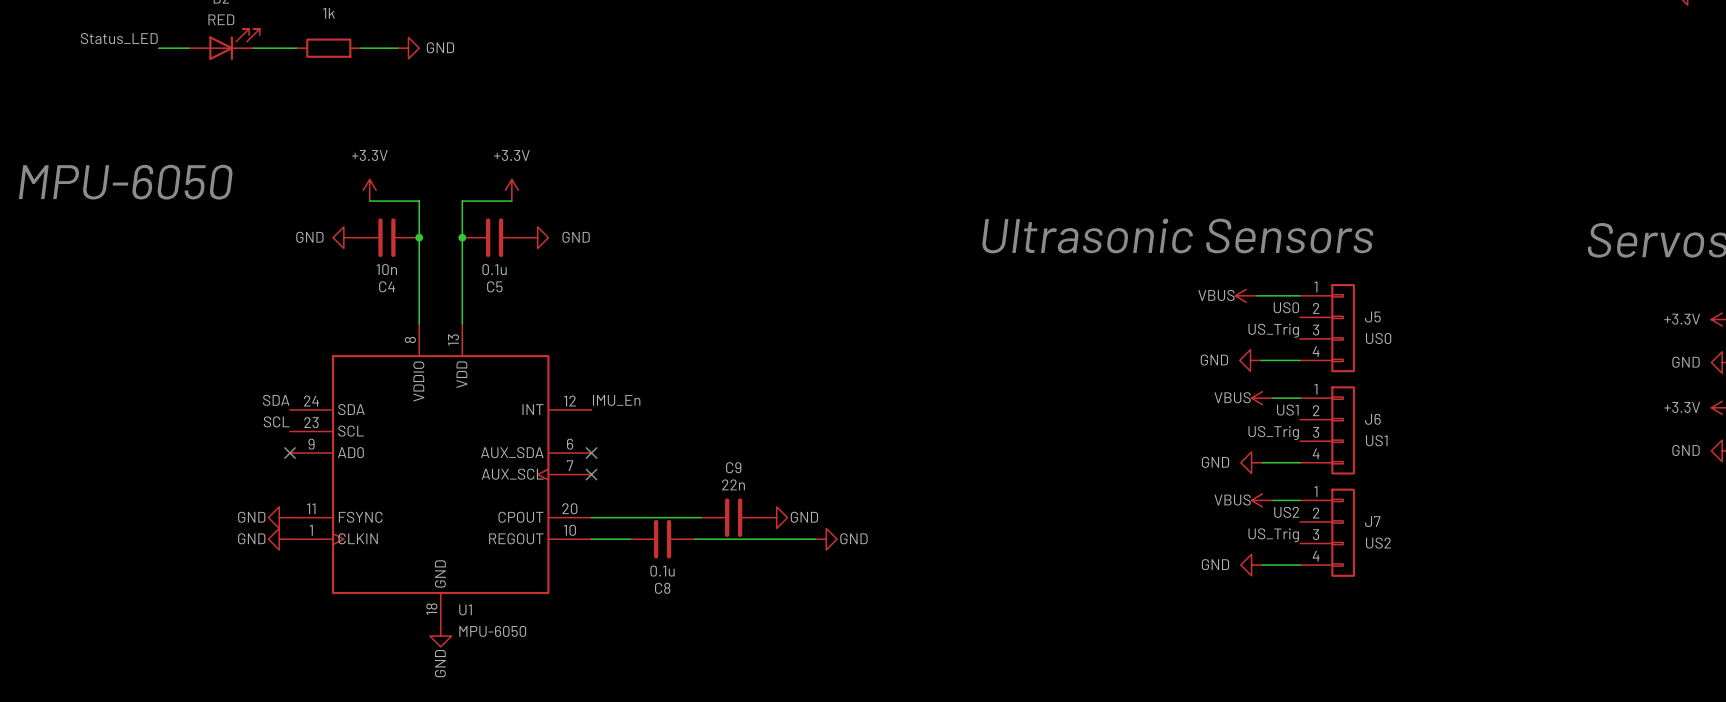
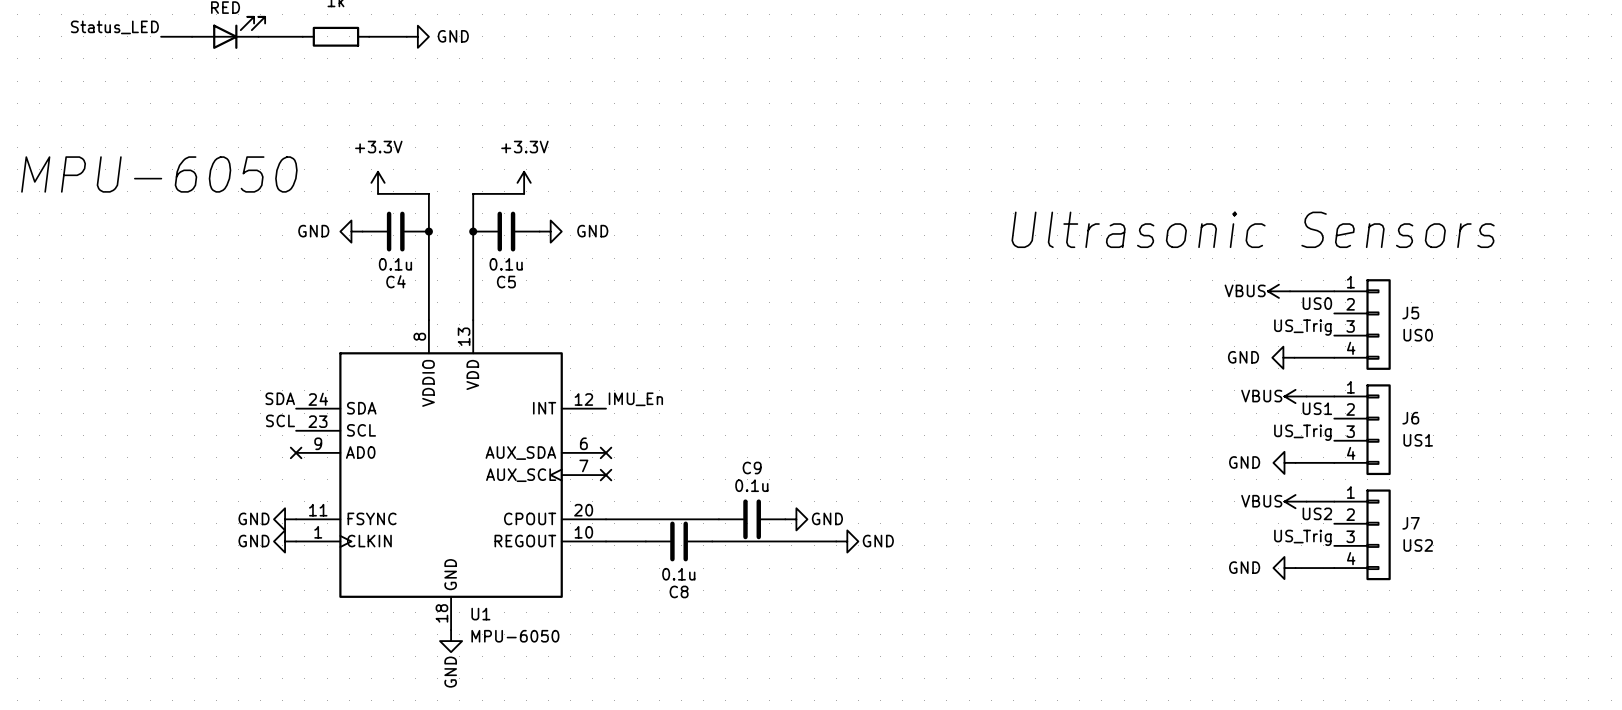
C4 value: 10n (386, 269) -> 0.1u (395, 264)
C9 value: 22n (733, 484) -> 0.1u (751, 485)

